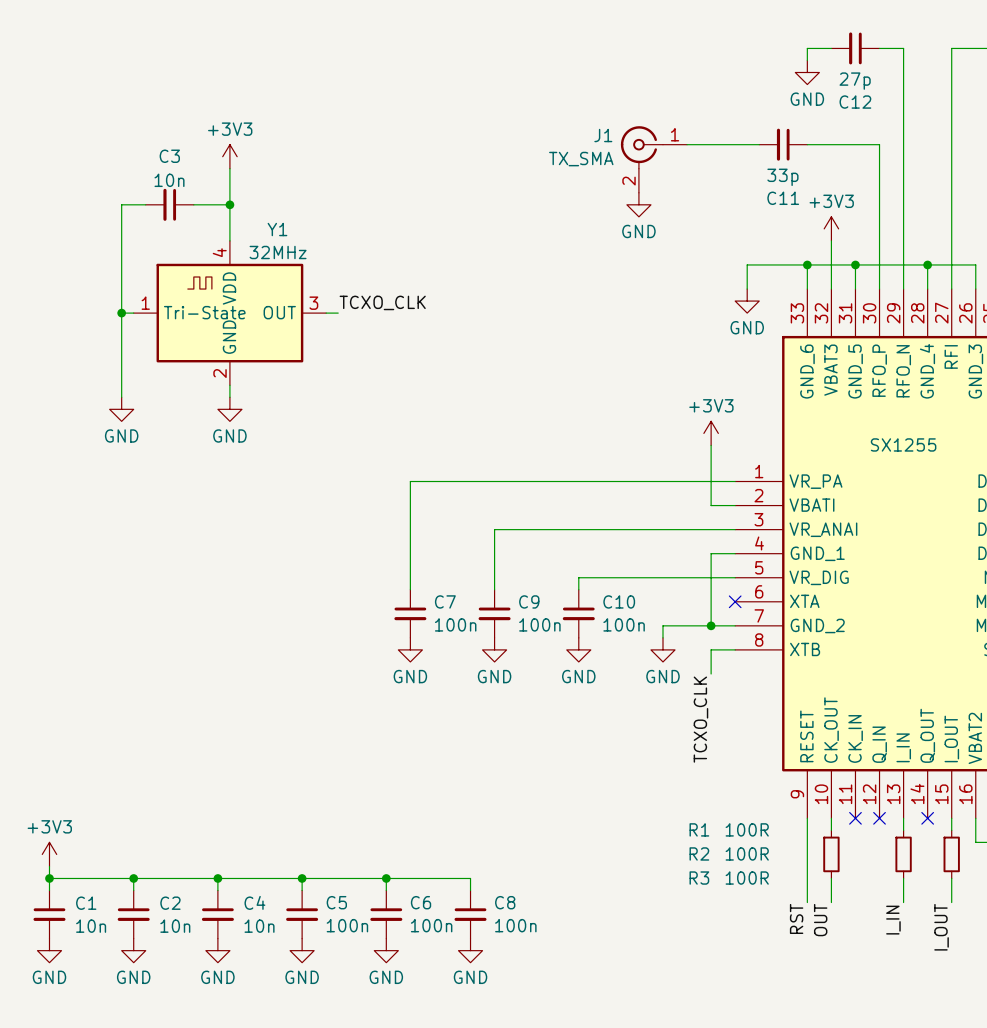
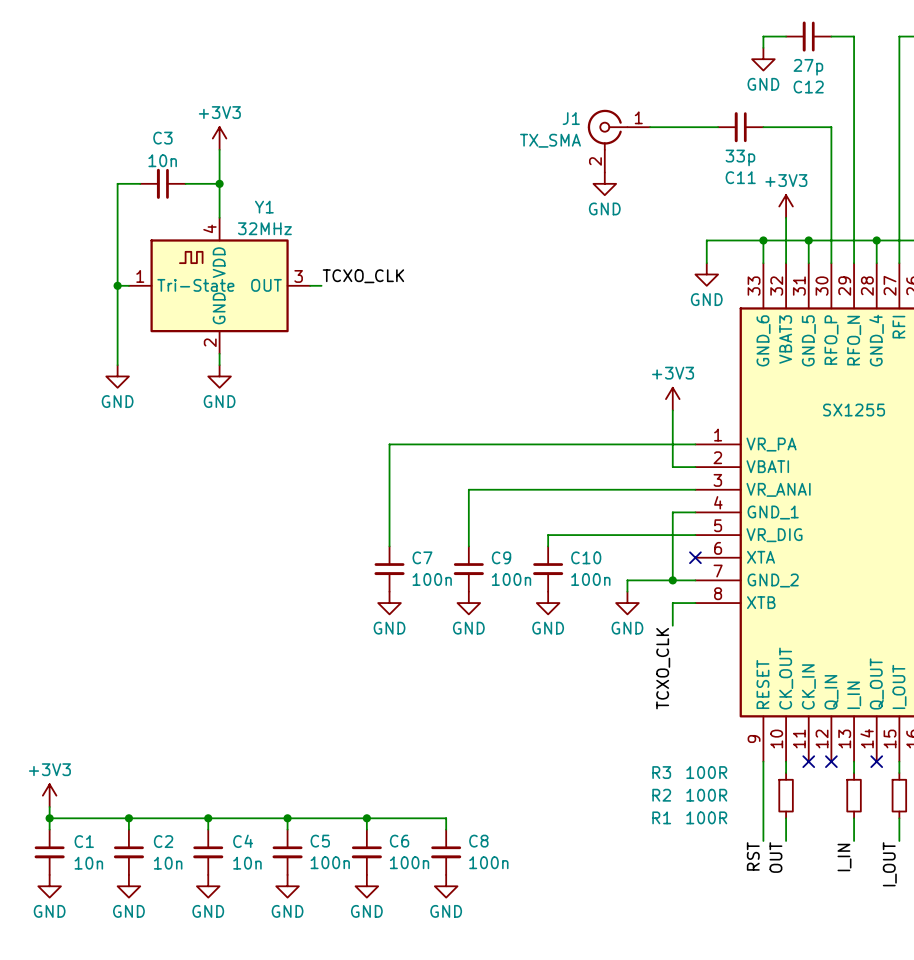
R1 name position: R1 (699, 829) -> R1 (661, 817)
R3 name position: R3 (699, 878) -> R3 (661, 772)

